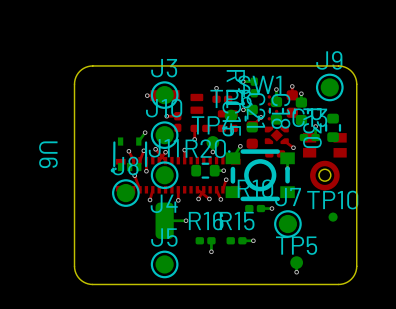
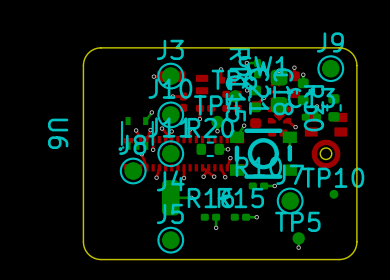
C21 footprint: [268, 96, 285, 125] -> [269, 69, 290, 113]

